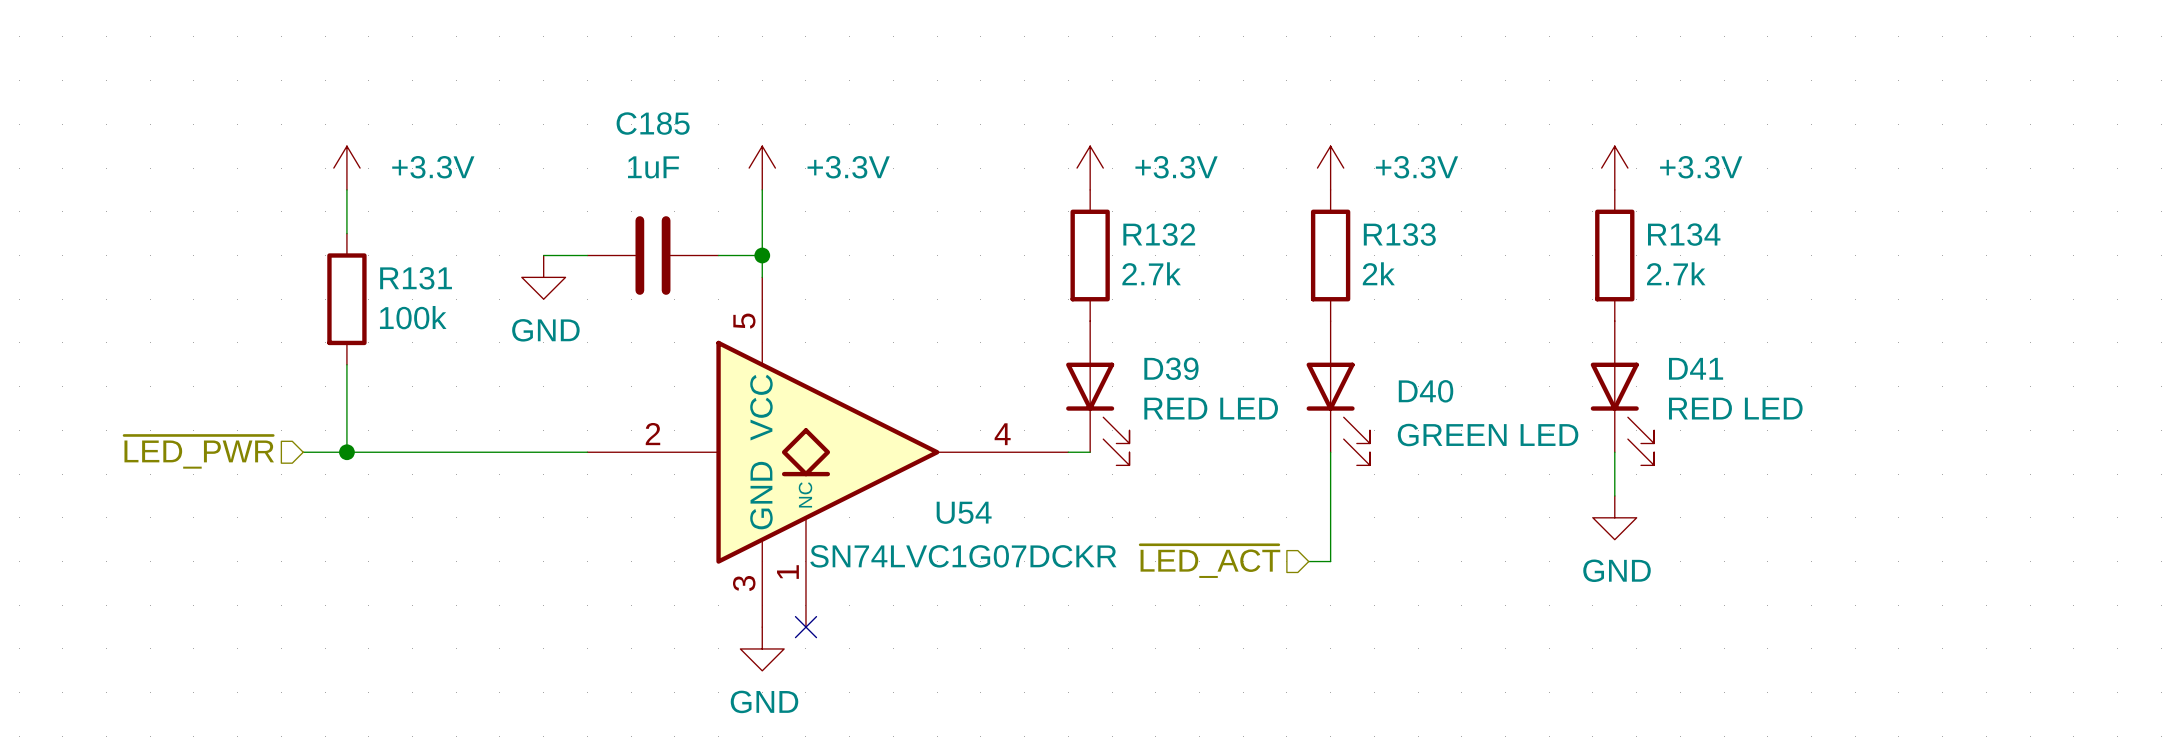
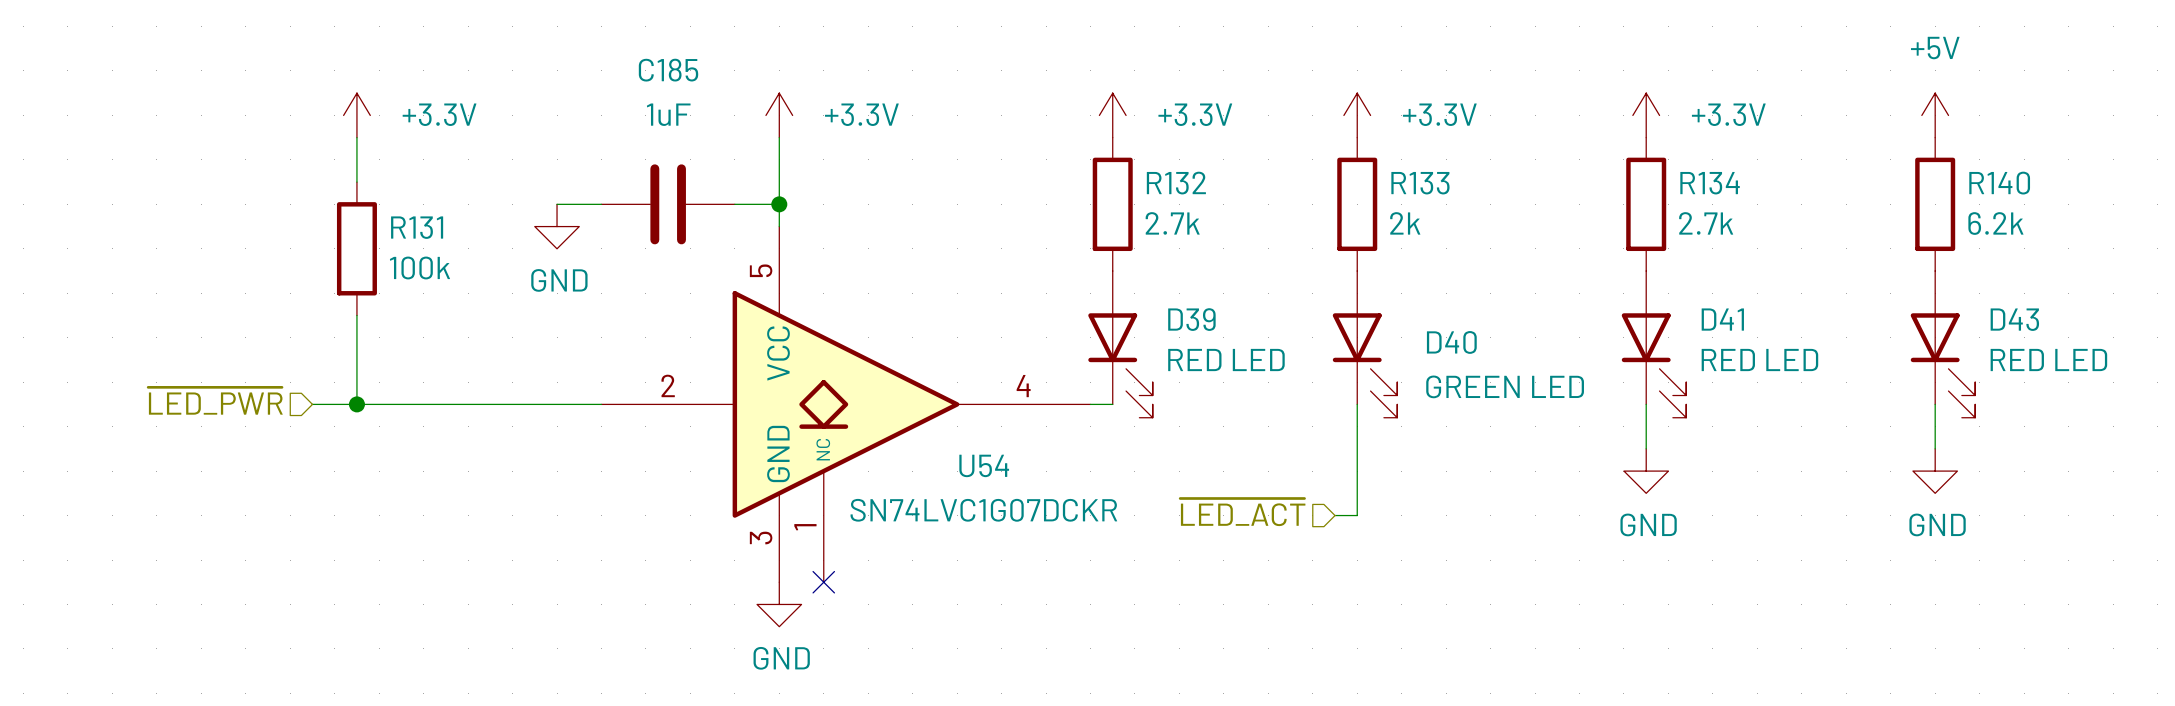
power symbol: none -> +5V (1935, 115)
R140: none -> 6.2k (1935, 204)
D43: none -> RED LED (1942, 344)
wire: none -> (1935, 404) (1935, 448)
power symbol: none -> GND (1935, 471)

